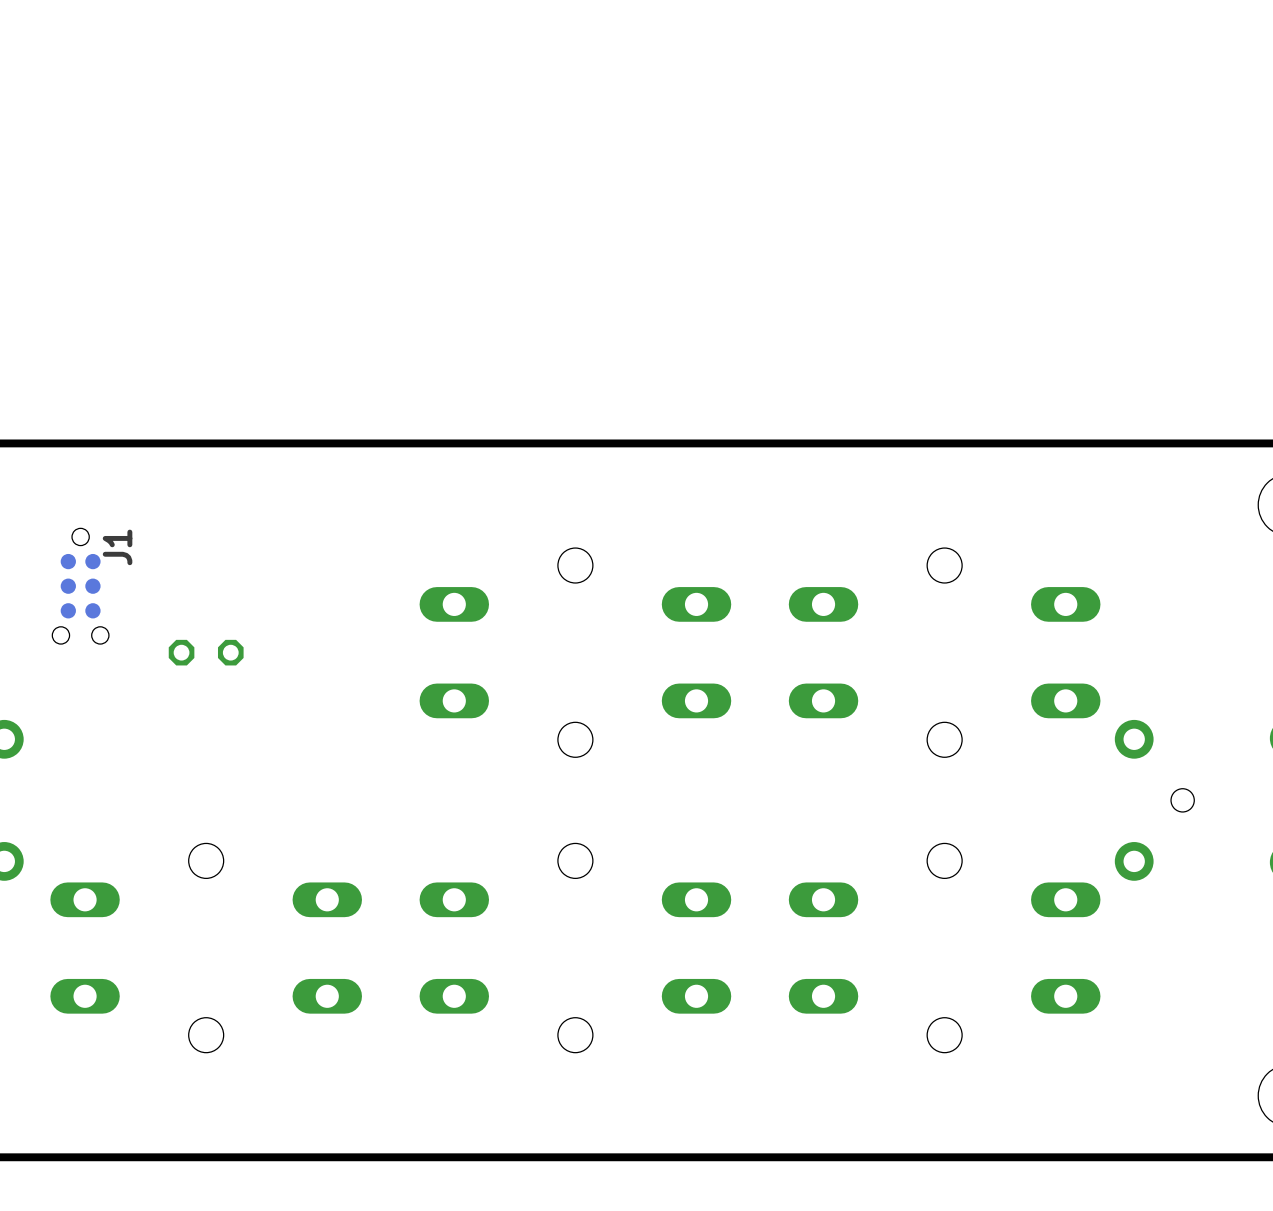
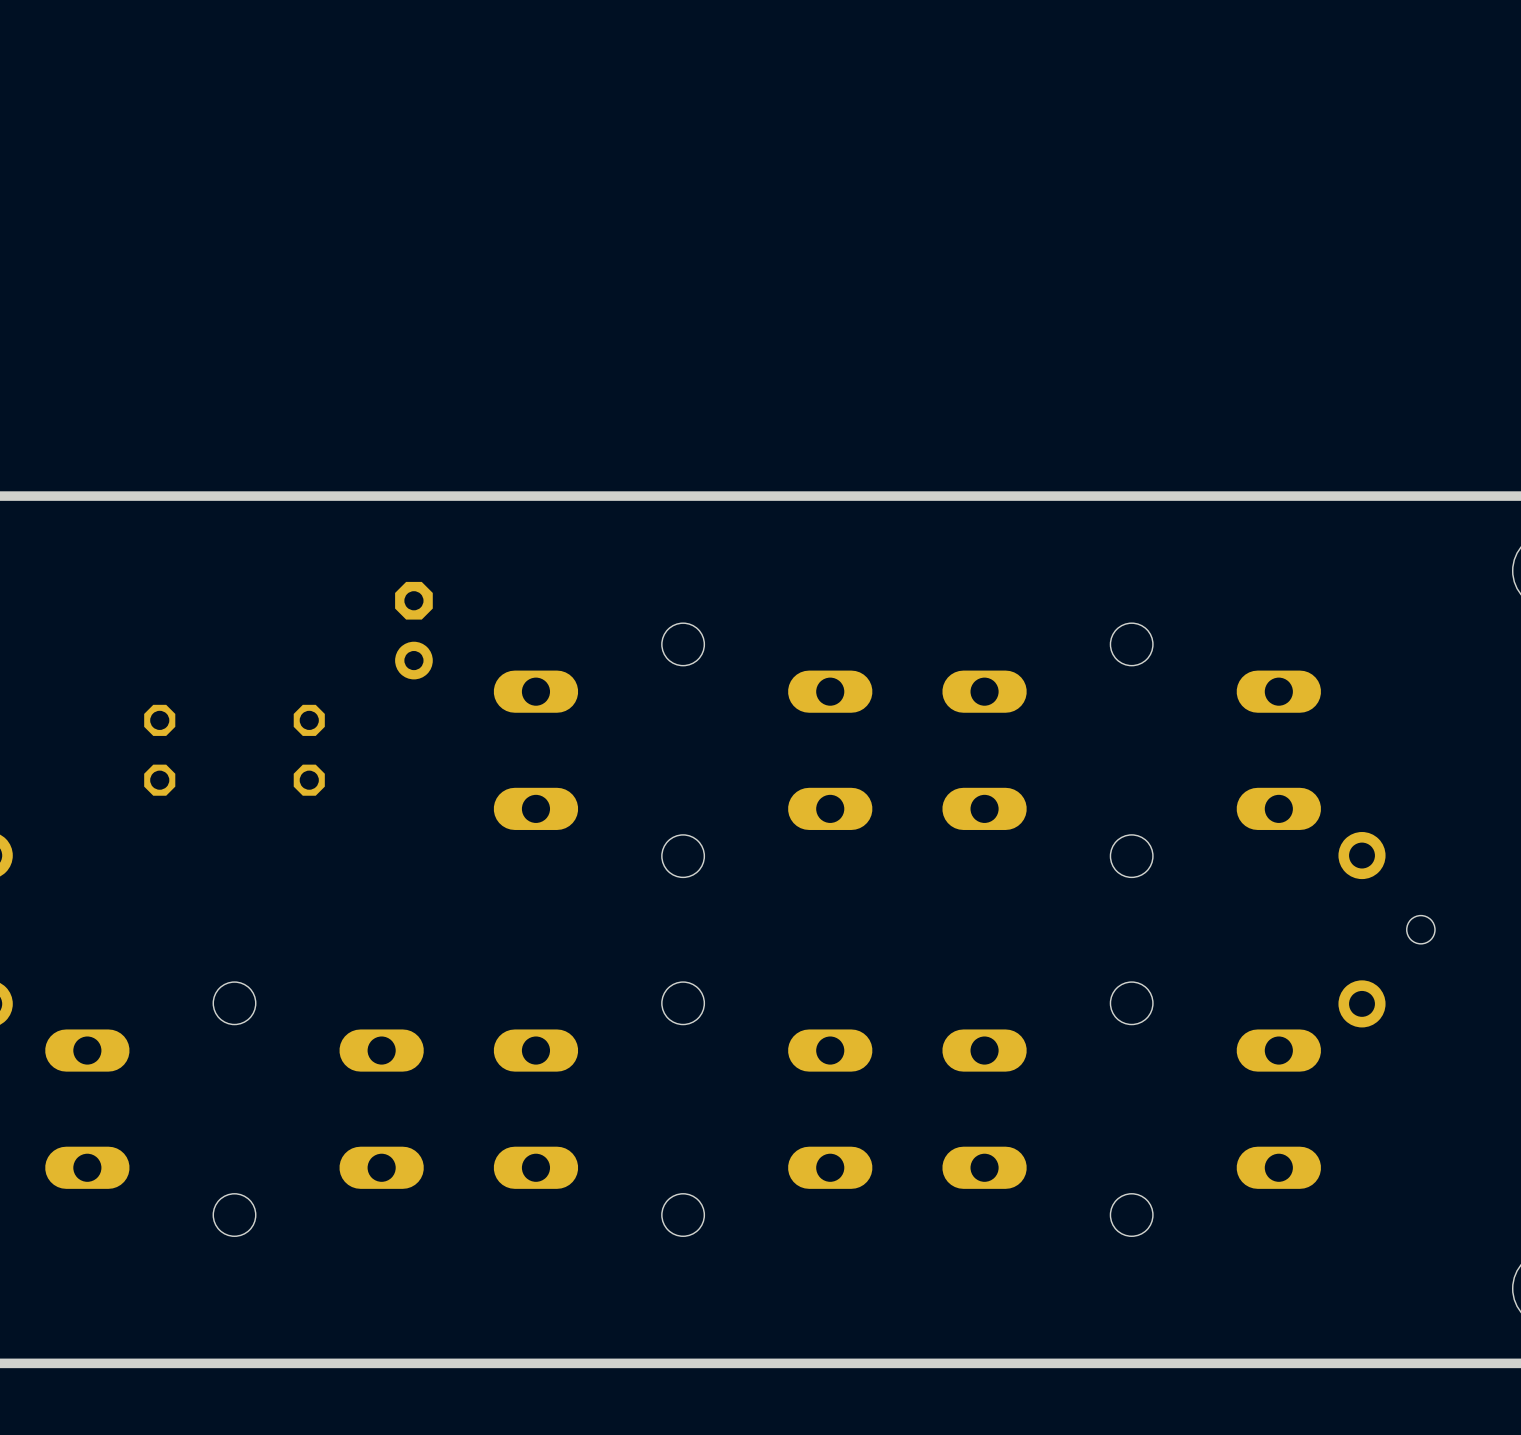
part: none -> (413, 630)
J1: (80, 586) -> none
part: none -> (159, 750)
part: (206, 652) -> none
part: none -> (309, 750)

